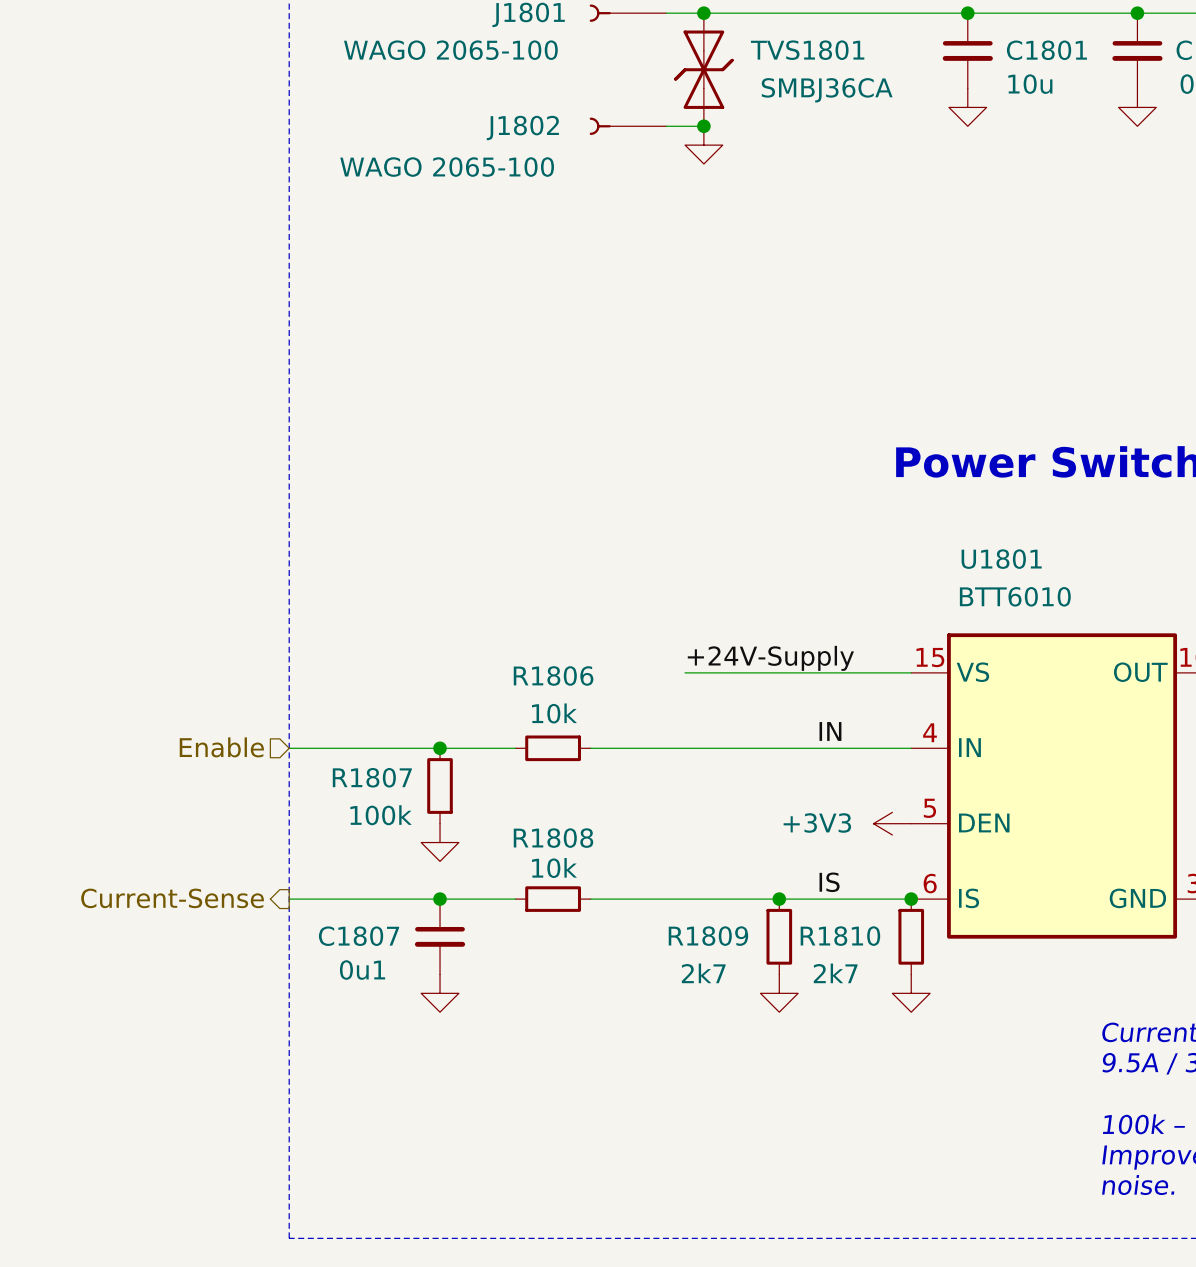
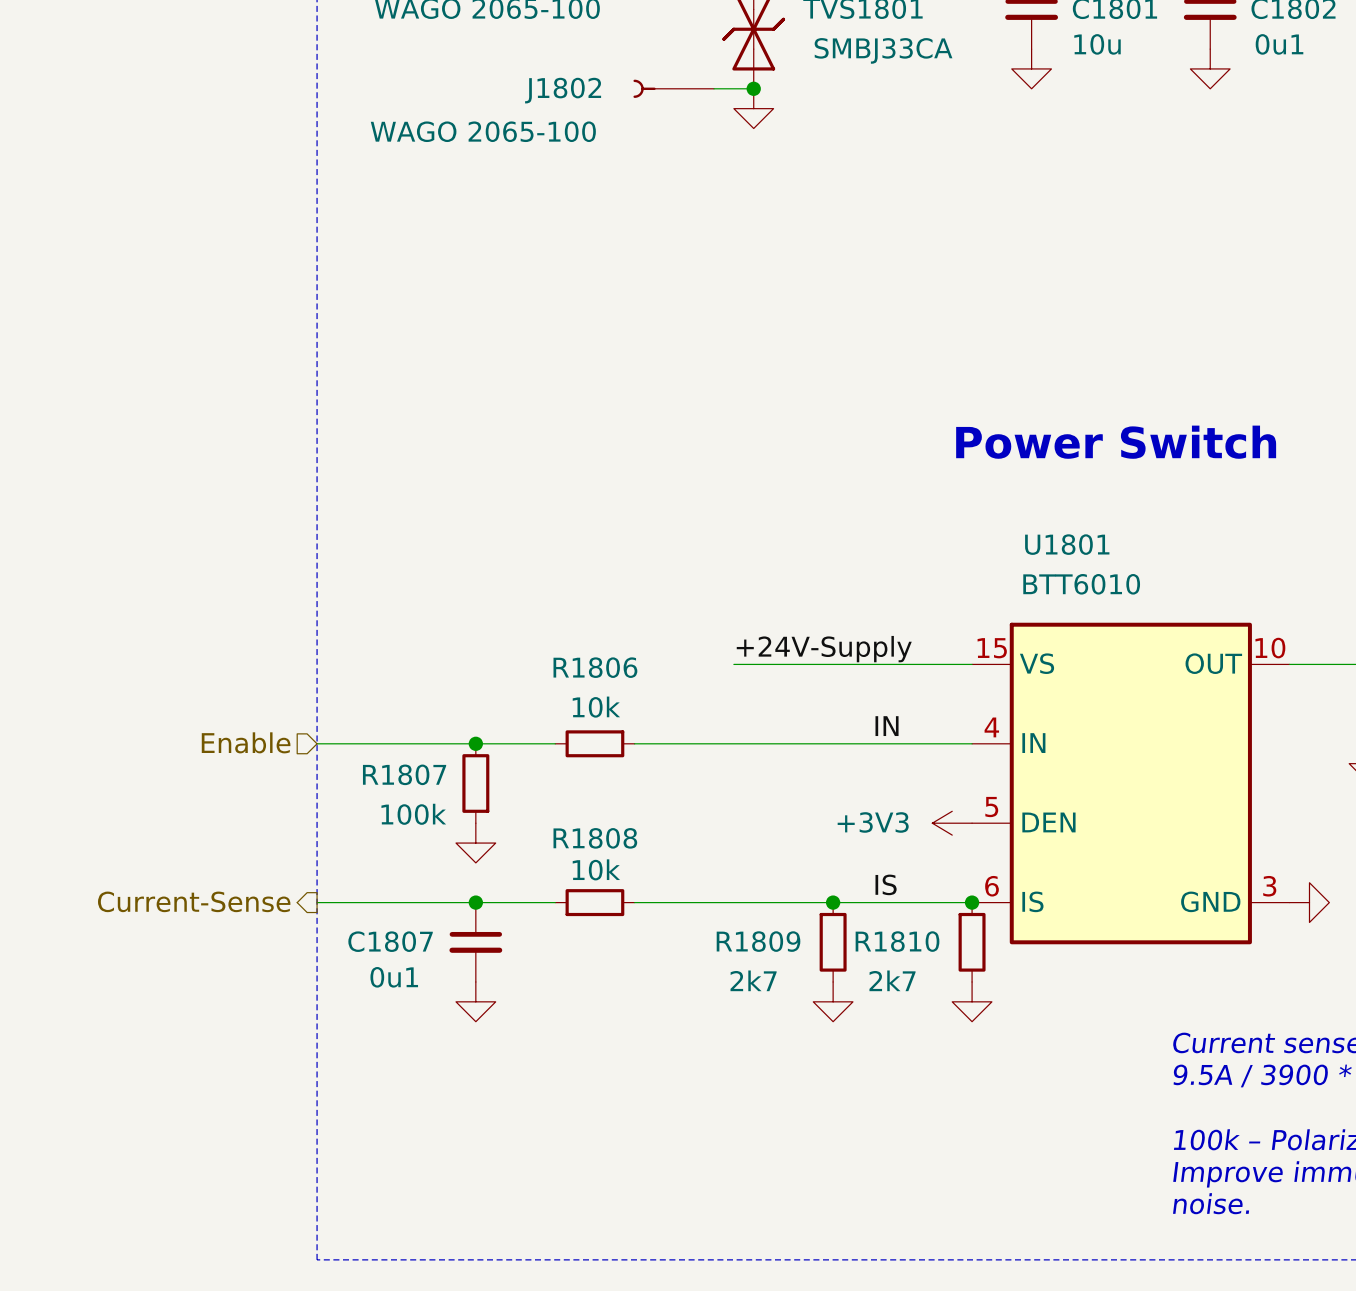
TVS1801 value: SMBJ36CA (827, 90) -> SMBJ33CA (883, 50)

